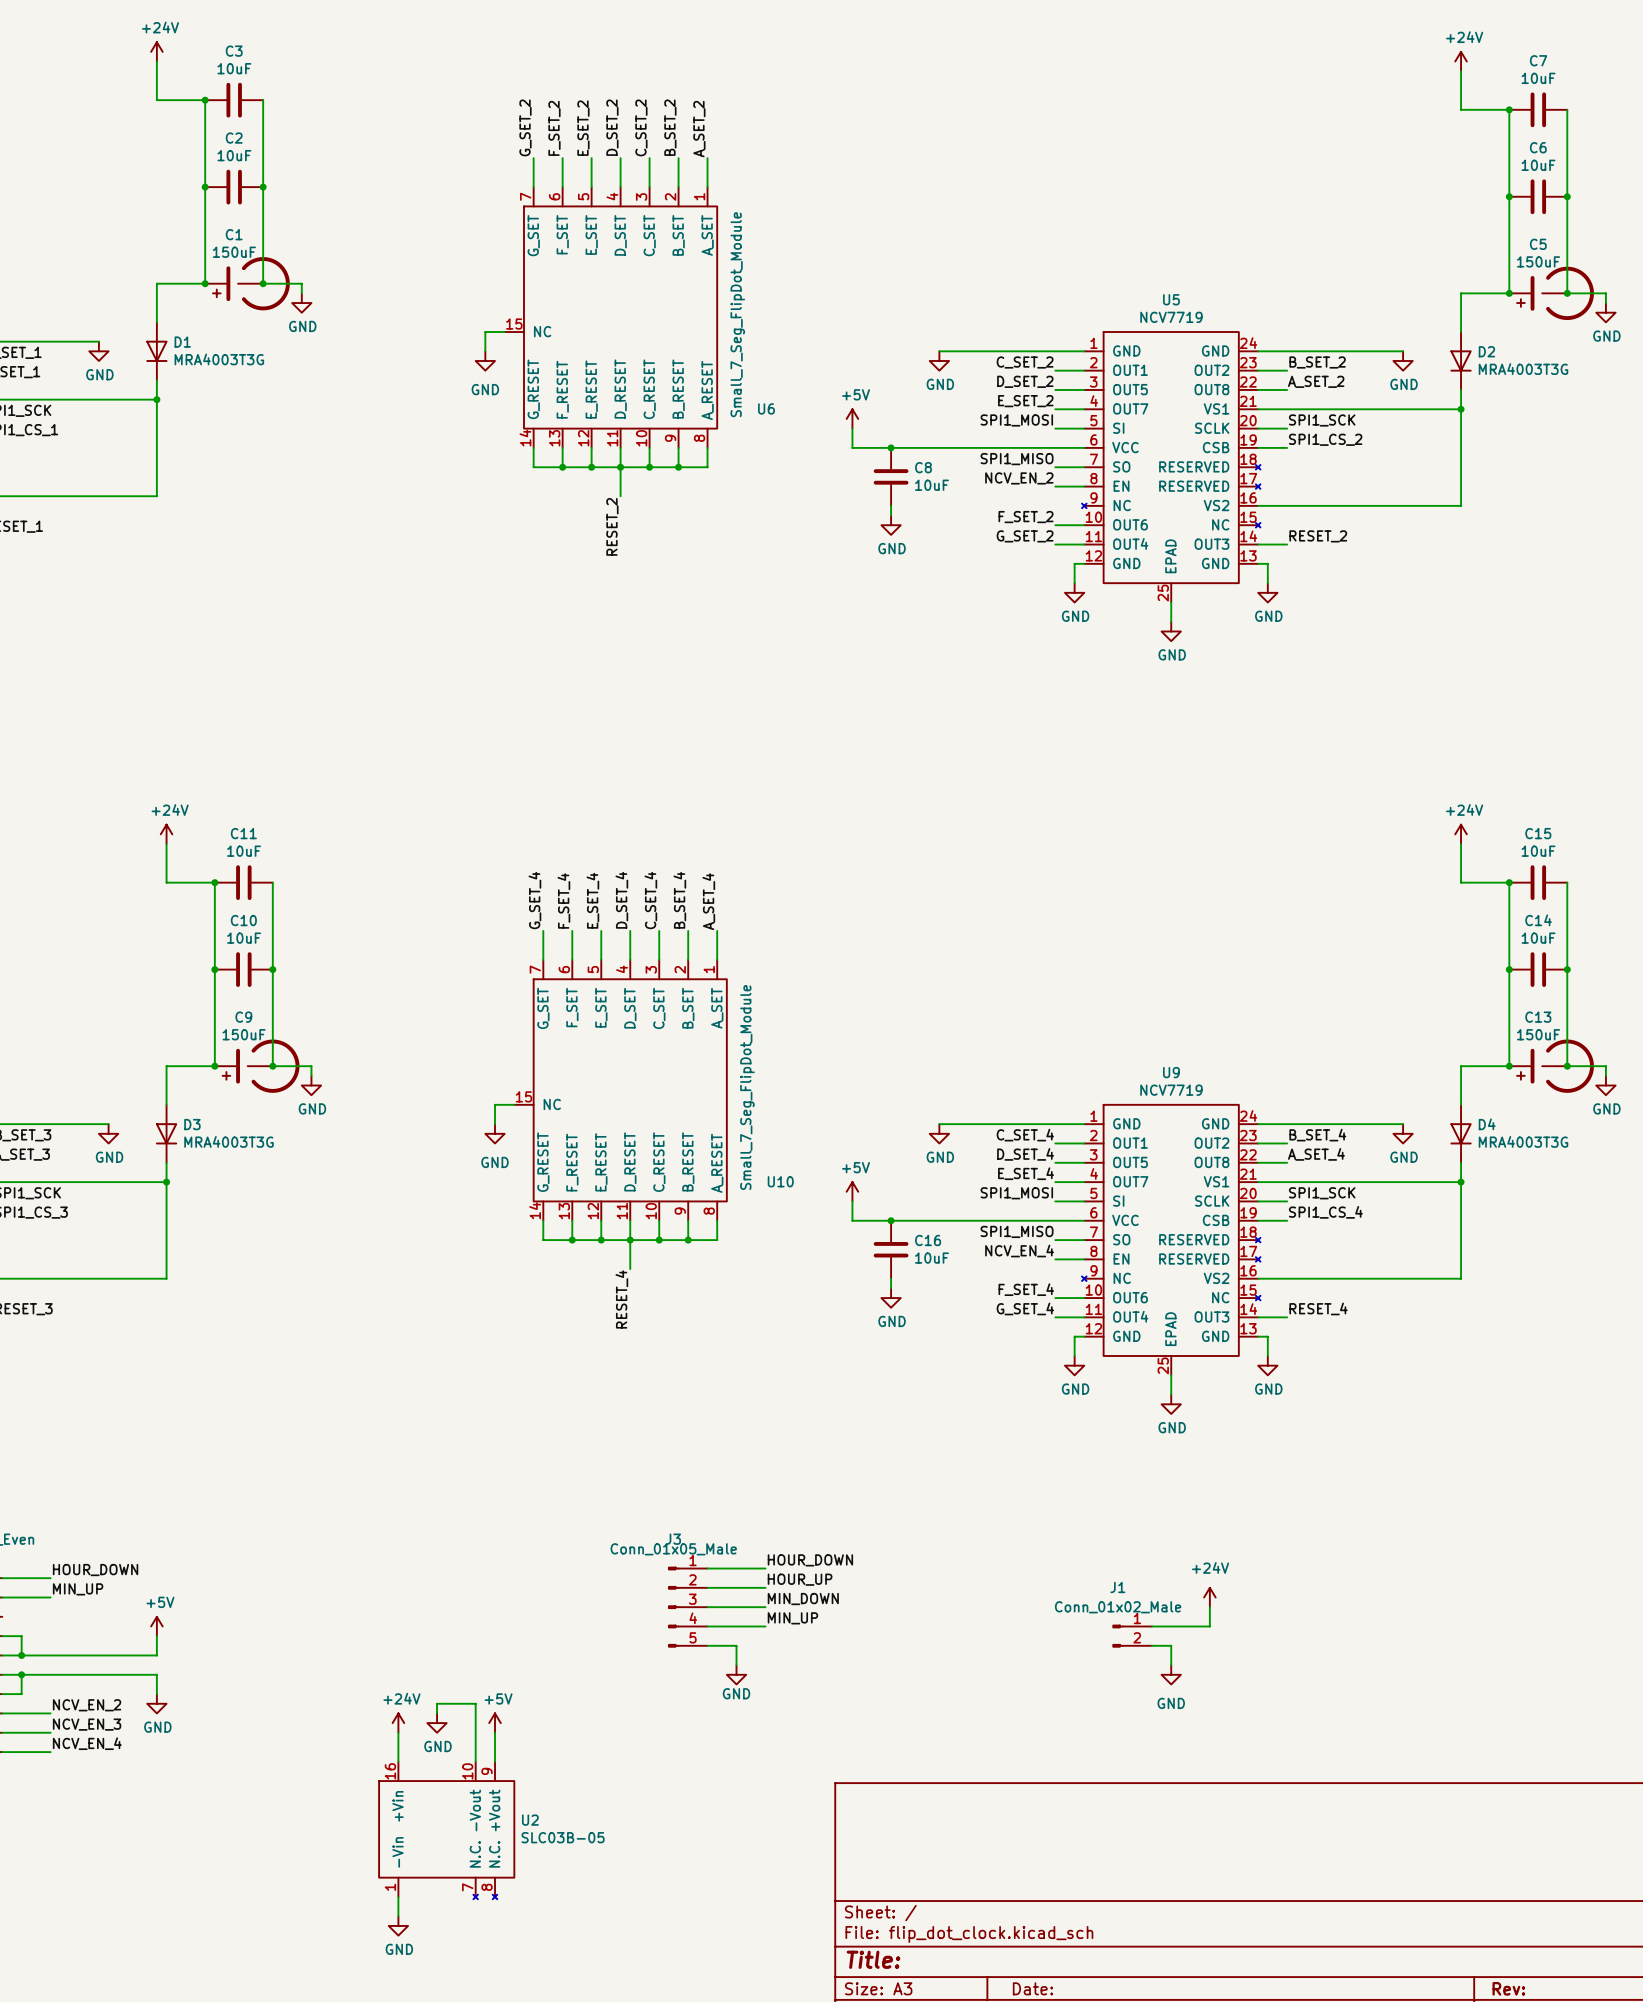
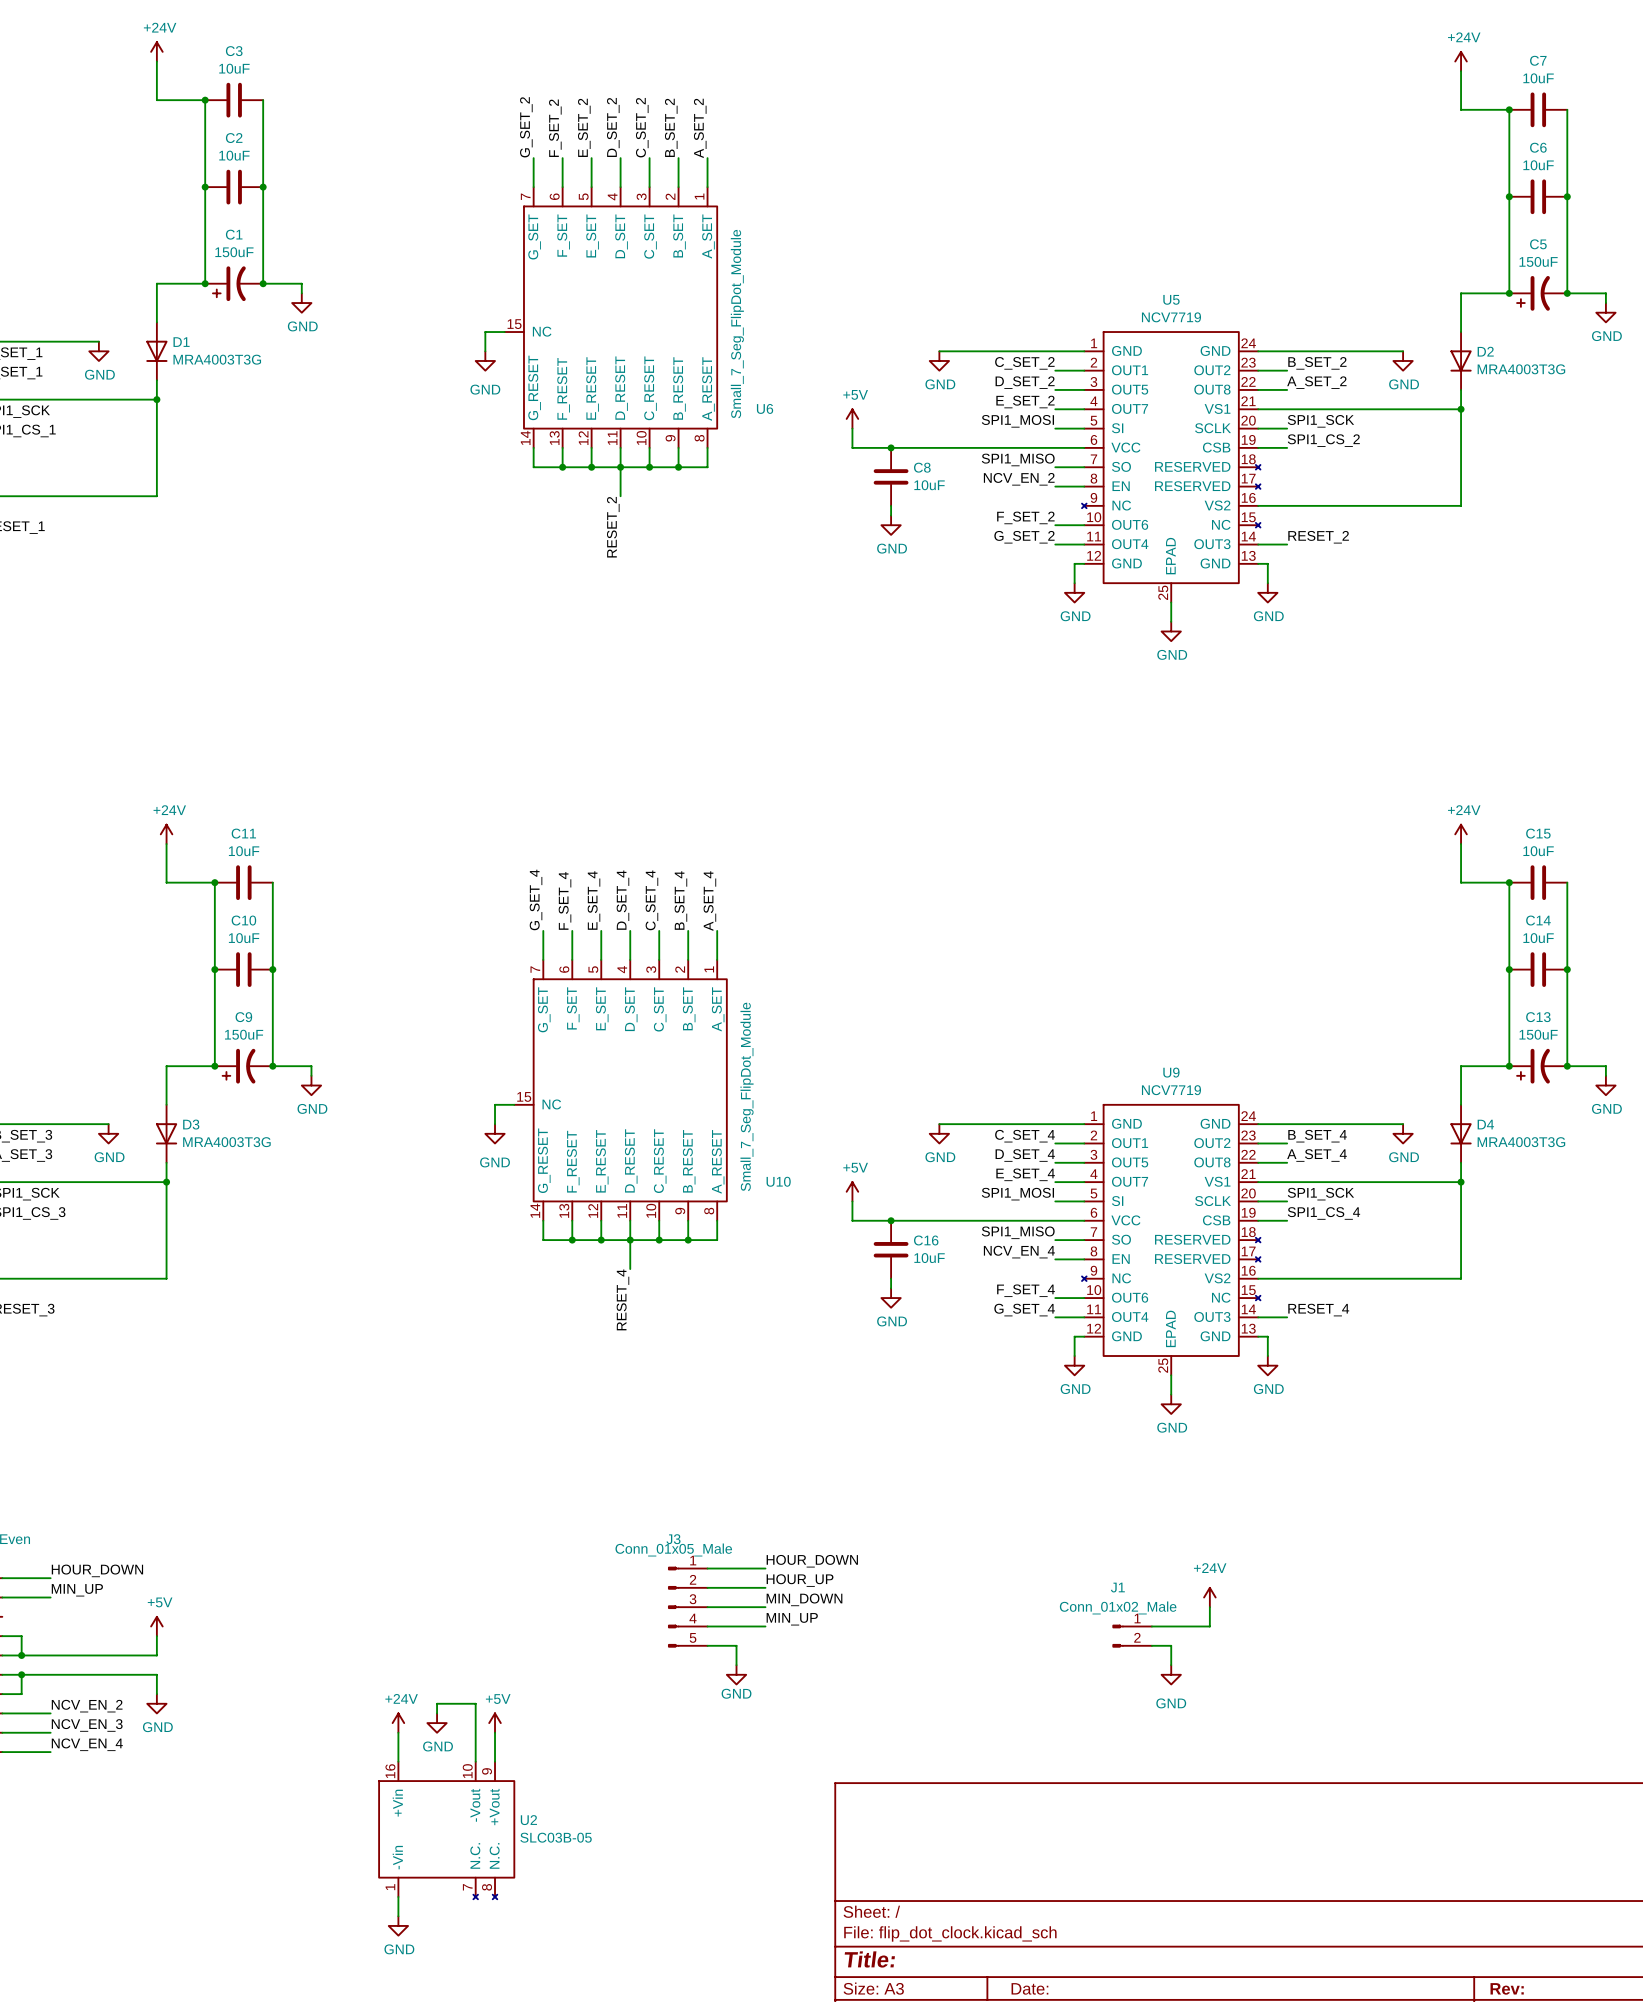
C1 symbol: [205, 257, 290, 311] -> [205, 266, 264, 302]
C5 symbol: [1509, 266, 1594, 321] -> [1509, 275, 1568, 311]
C9 symbol: [214, 1039, 300, 1093] -> [214, 1048, 273, 1084]
C13 symbol: [1509, 1039, 1594, 1093] -> [1509, 1048, 1568, 1084]

